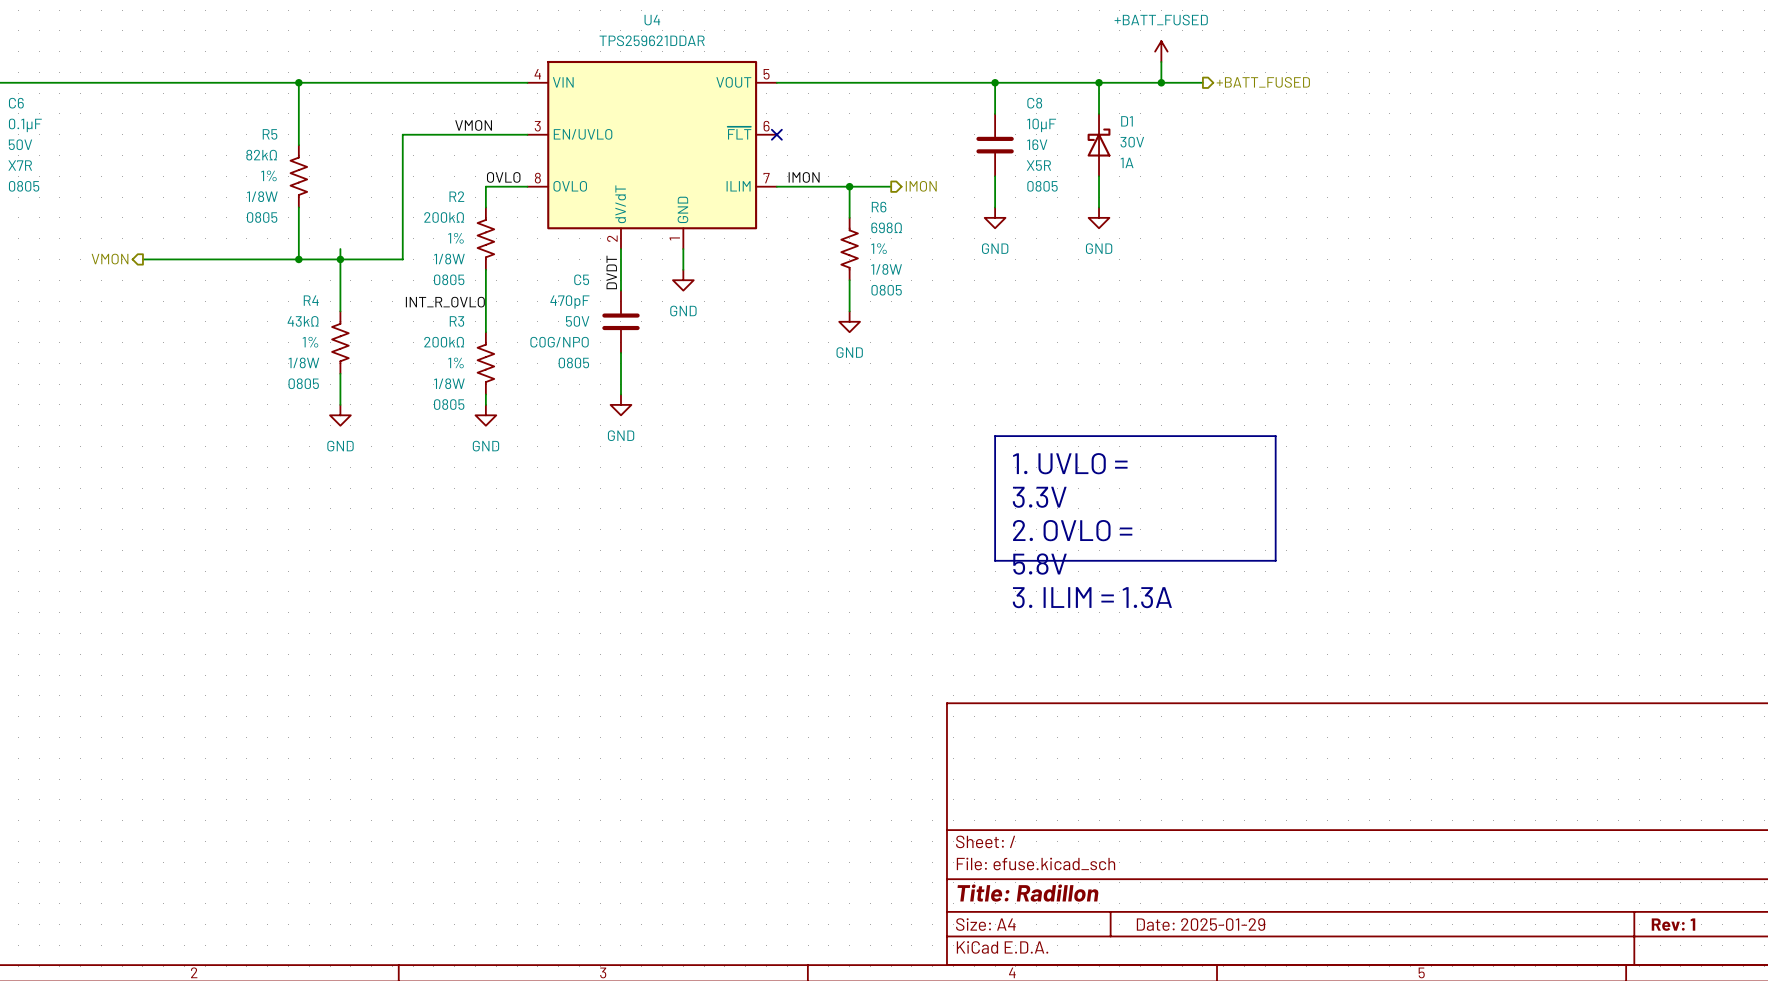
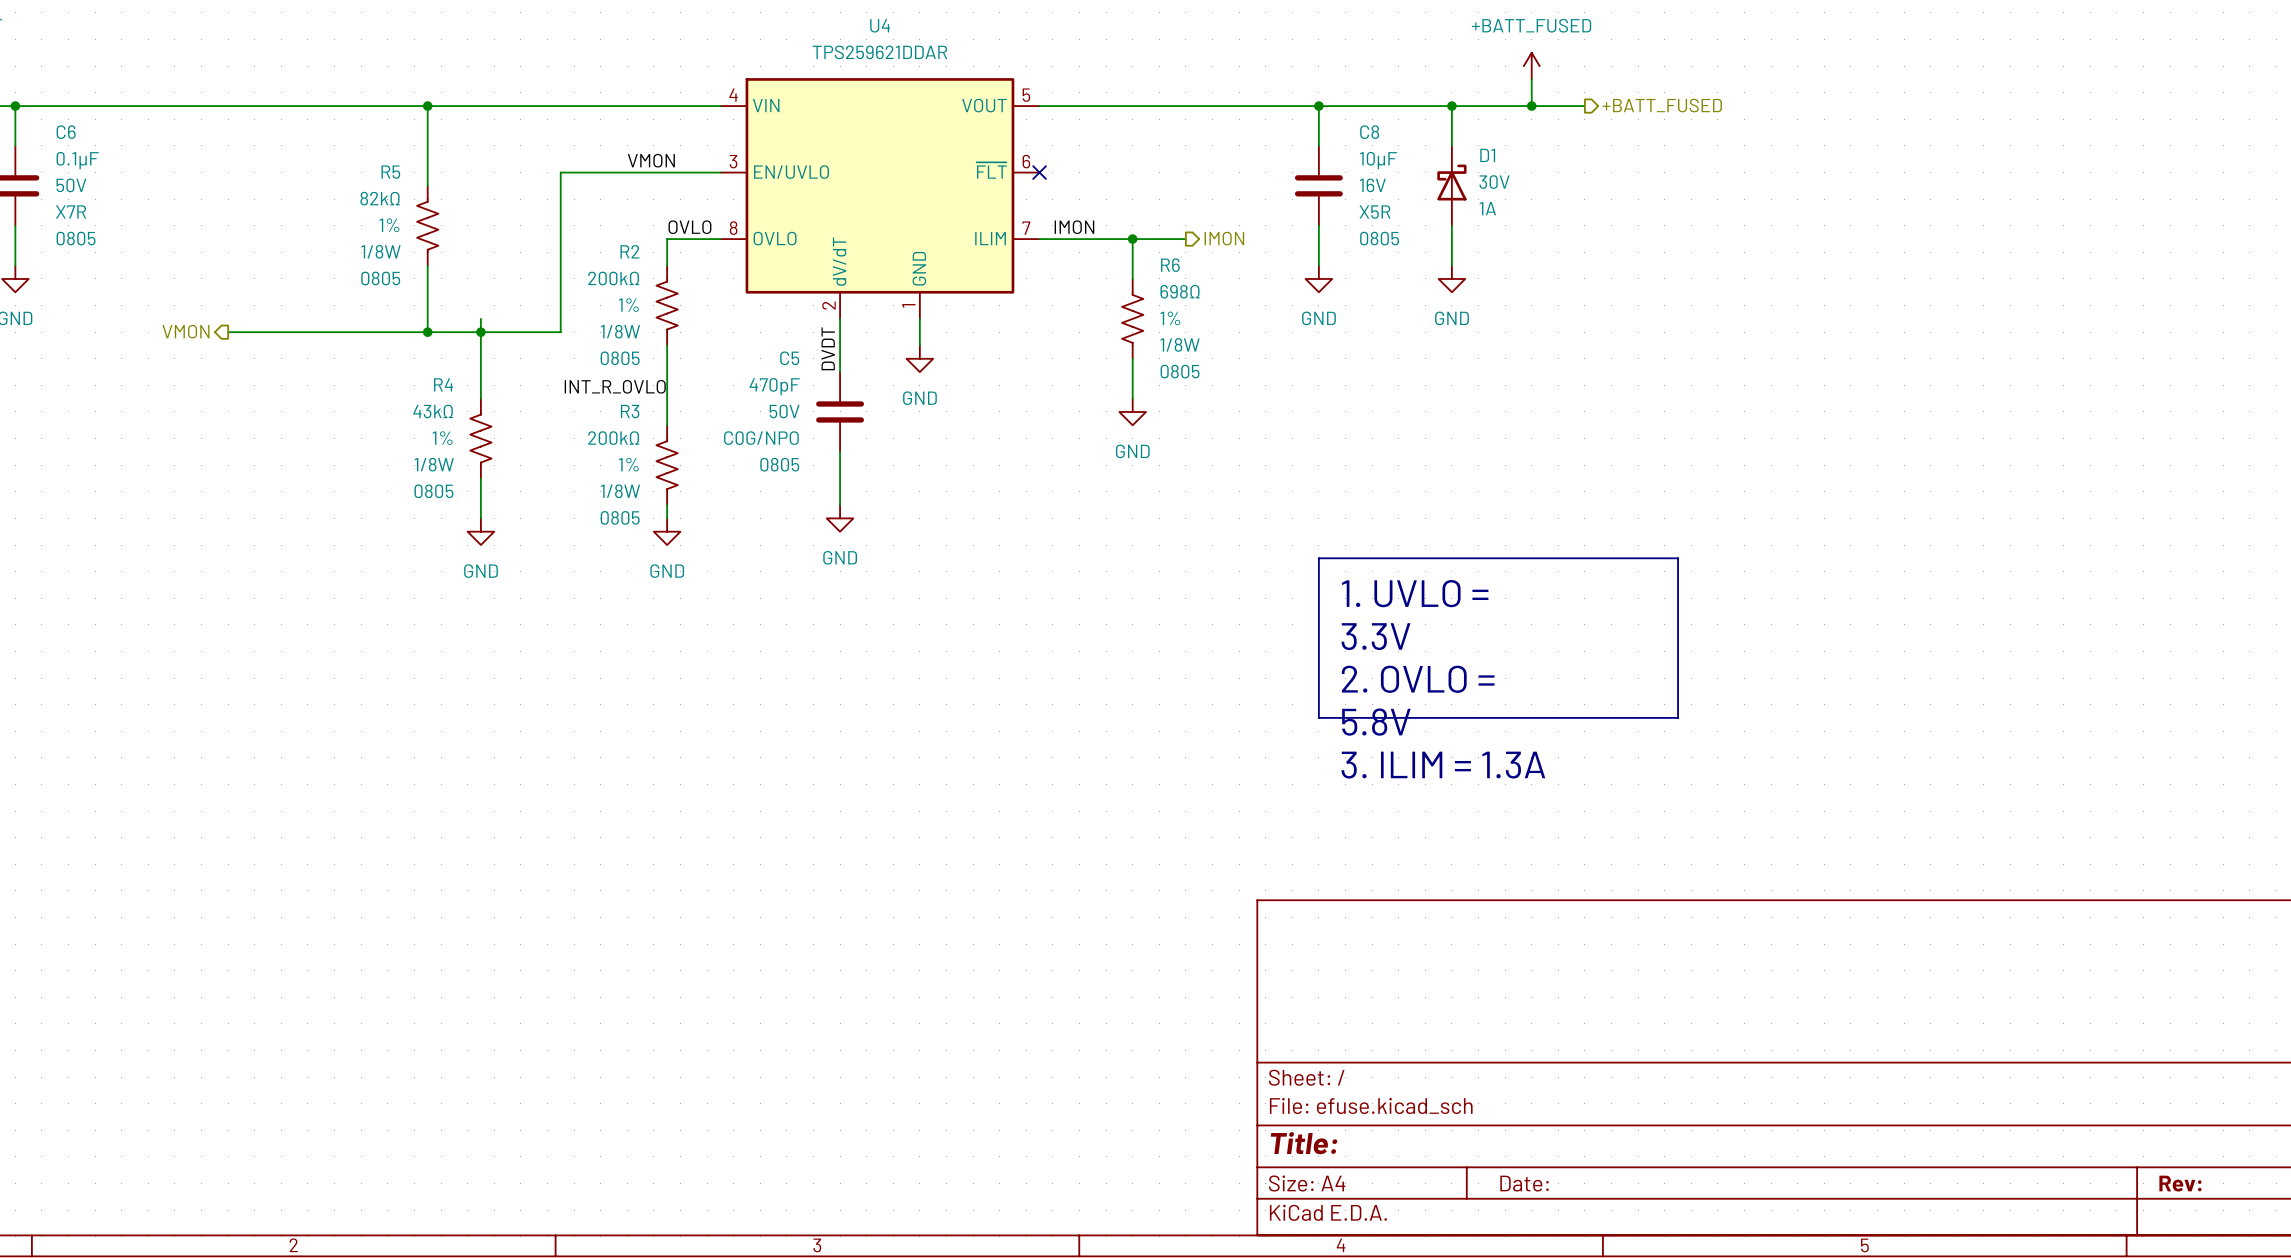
title block: Title: Radillon (1028, 893) -> Title: (1304, 1143)
title block: Date: 2025-01-29 (1200, 924) -> Date: (1524, 1183)
title block: Rev: 1 (1673, 924) -> Rev: (2180, 1183)

